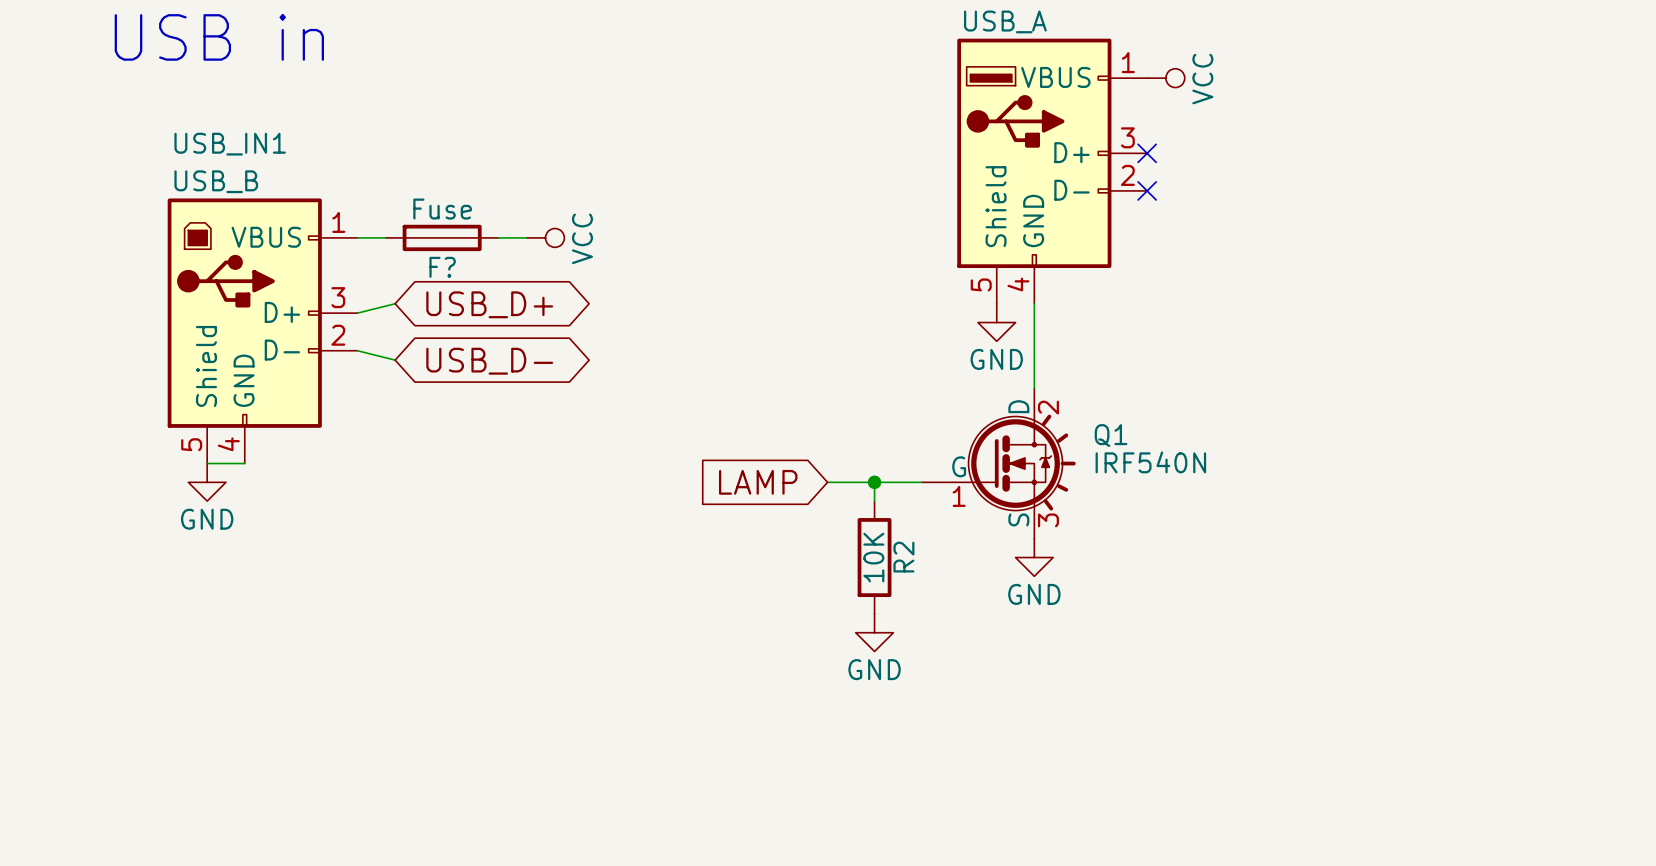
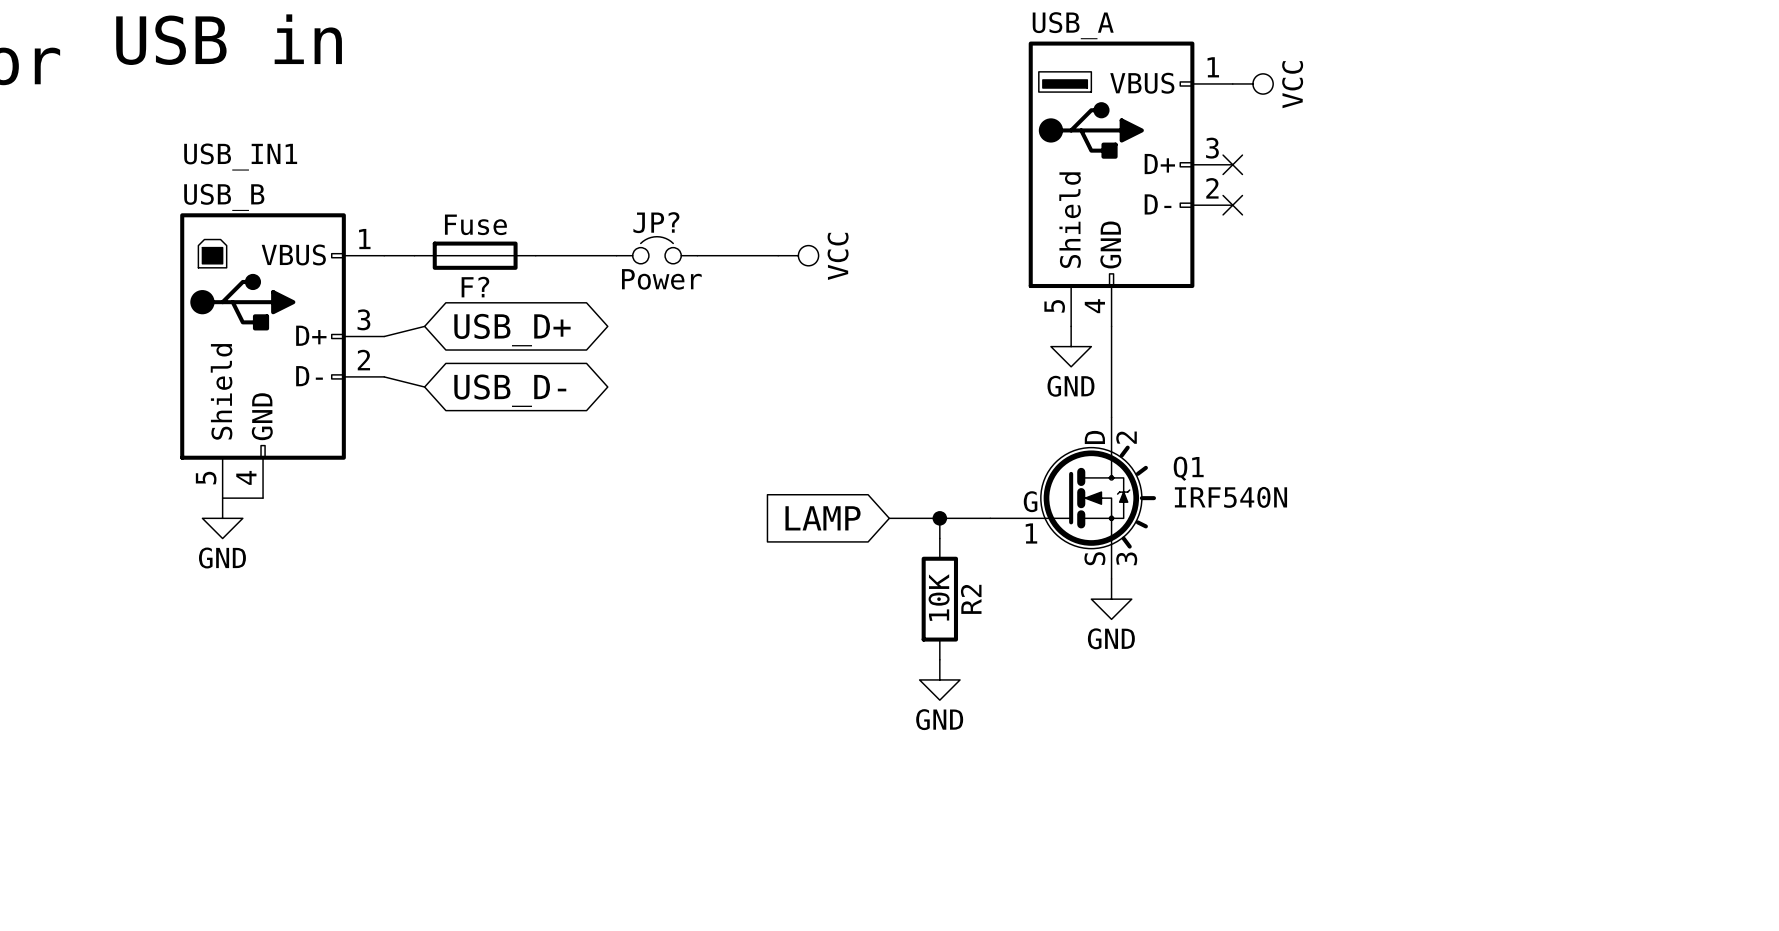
JP?: none -> Power (656, 250)
wire: none -> (566, 255) (616, 255)
power symbol position: VCC (545, 237) -> VCC (798, 255)
wire: none -> (697, 255) (778, 255)

